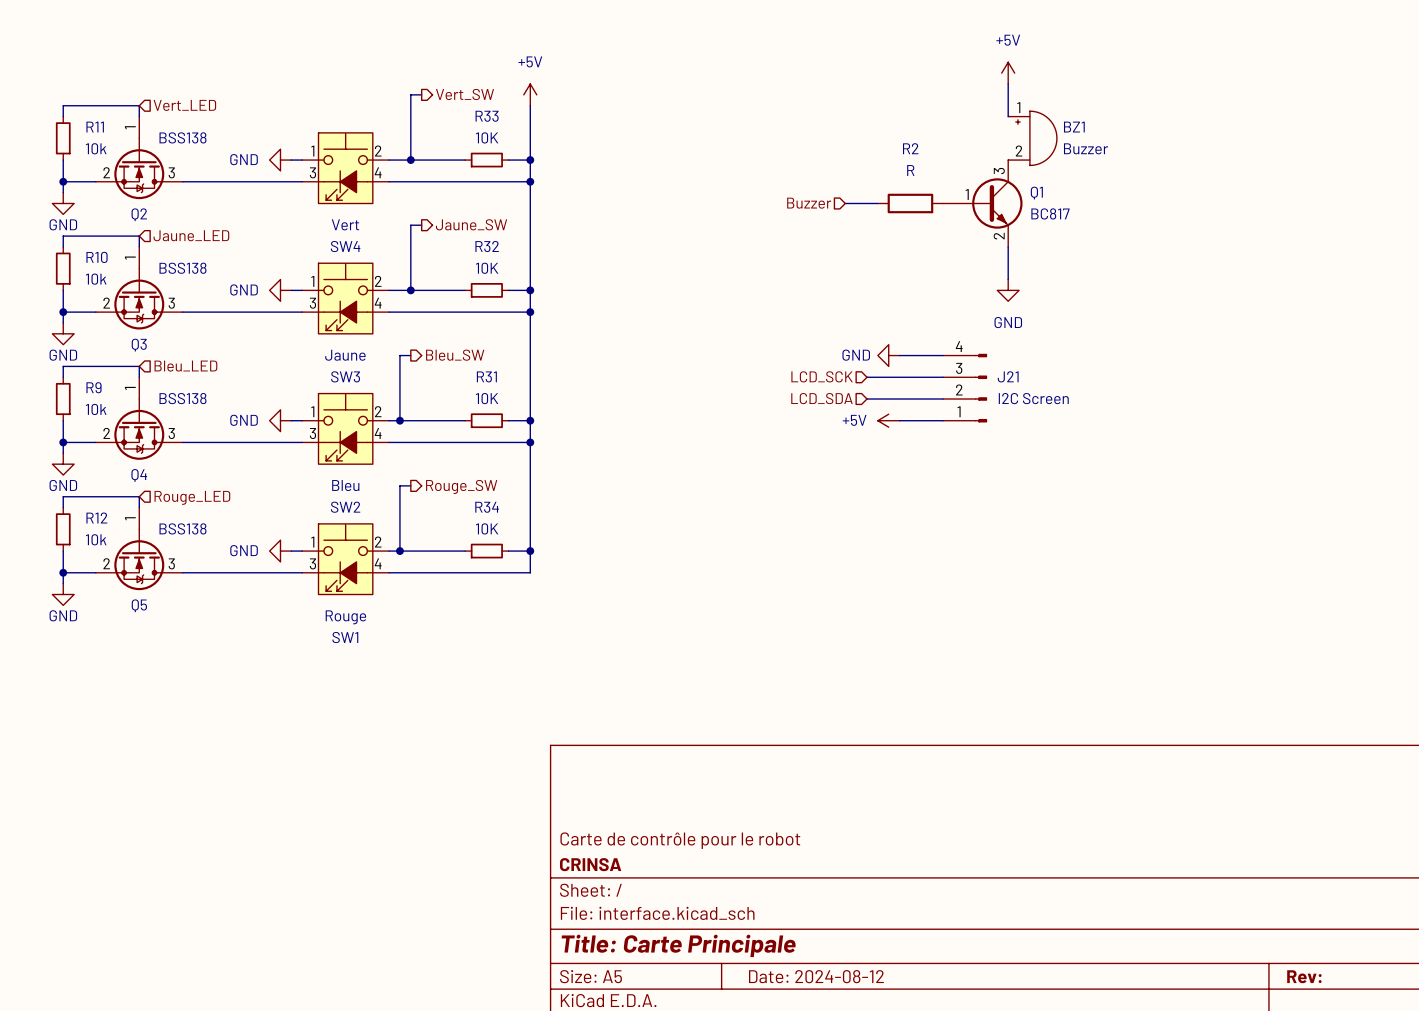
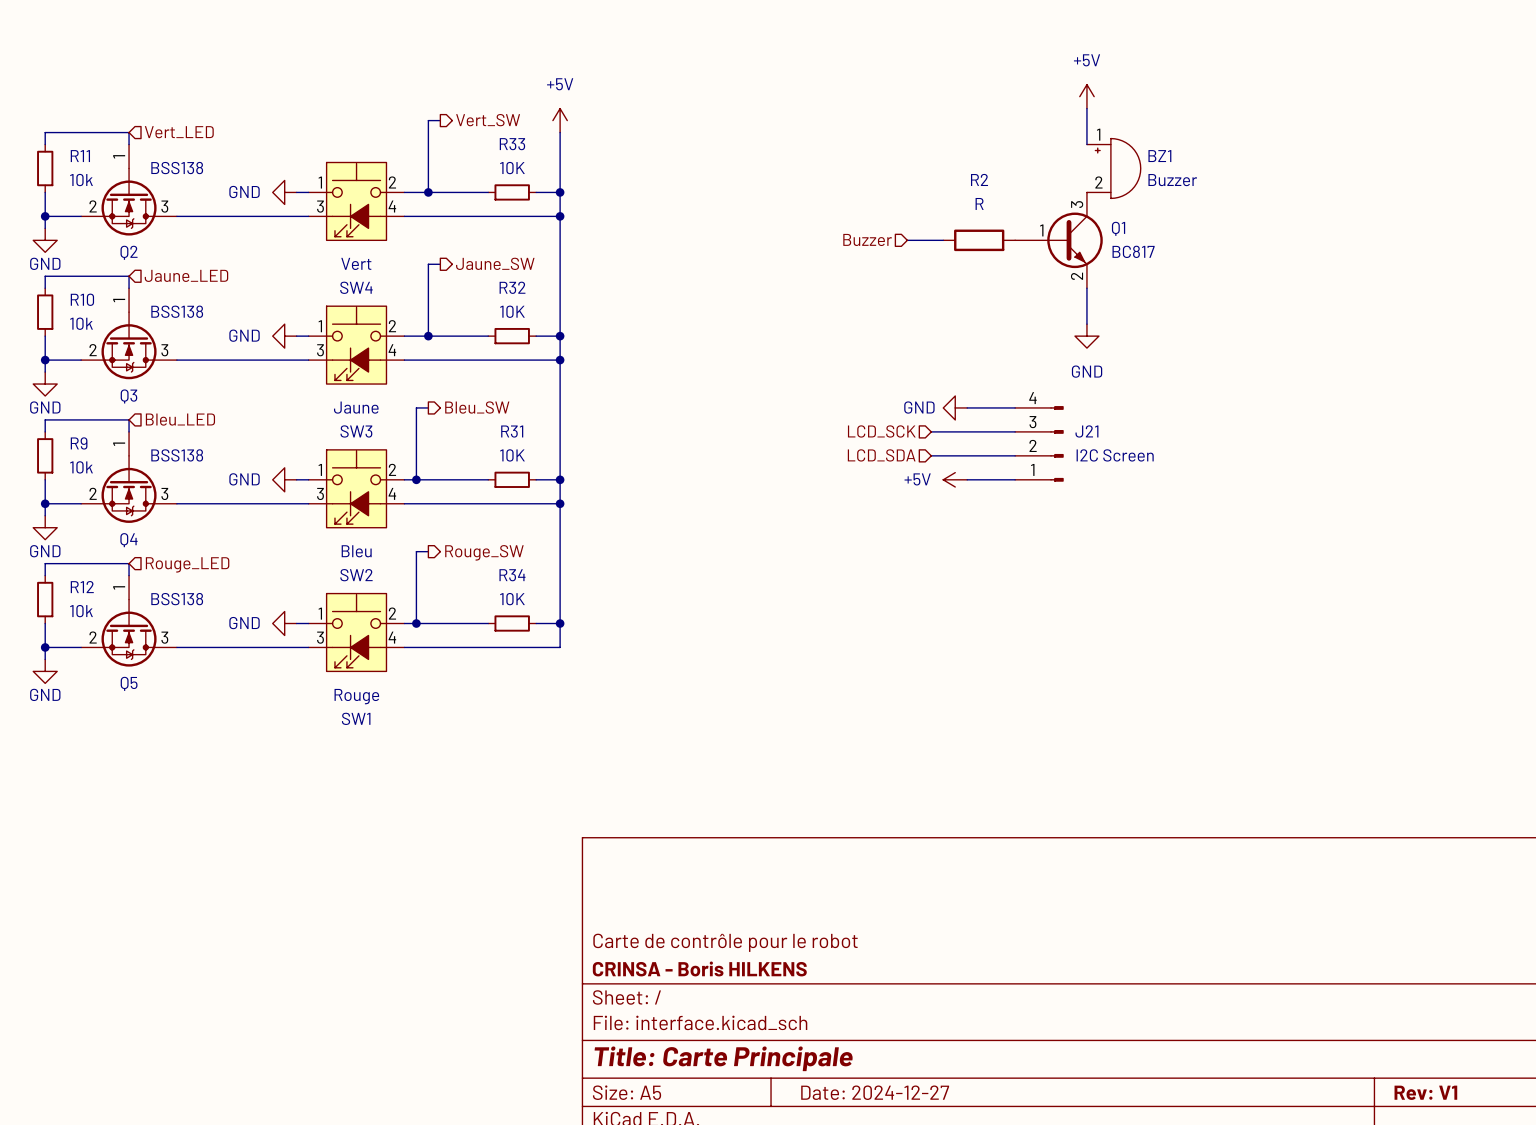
title block: CRINSA (590, 864) -> CRINSA - Boris HILKENS (699, 968)
title block: Date: 2024-08-12 (816, 976) -> Date: 2024-12-27 (875, 1092)
title block: Rev: (1304, 976) -> Rev: V1 (1425, 1092)

